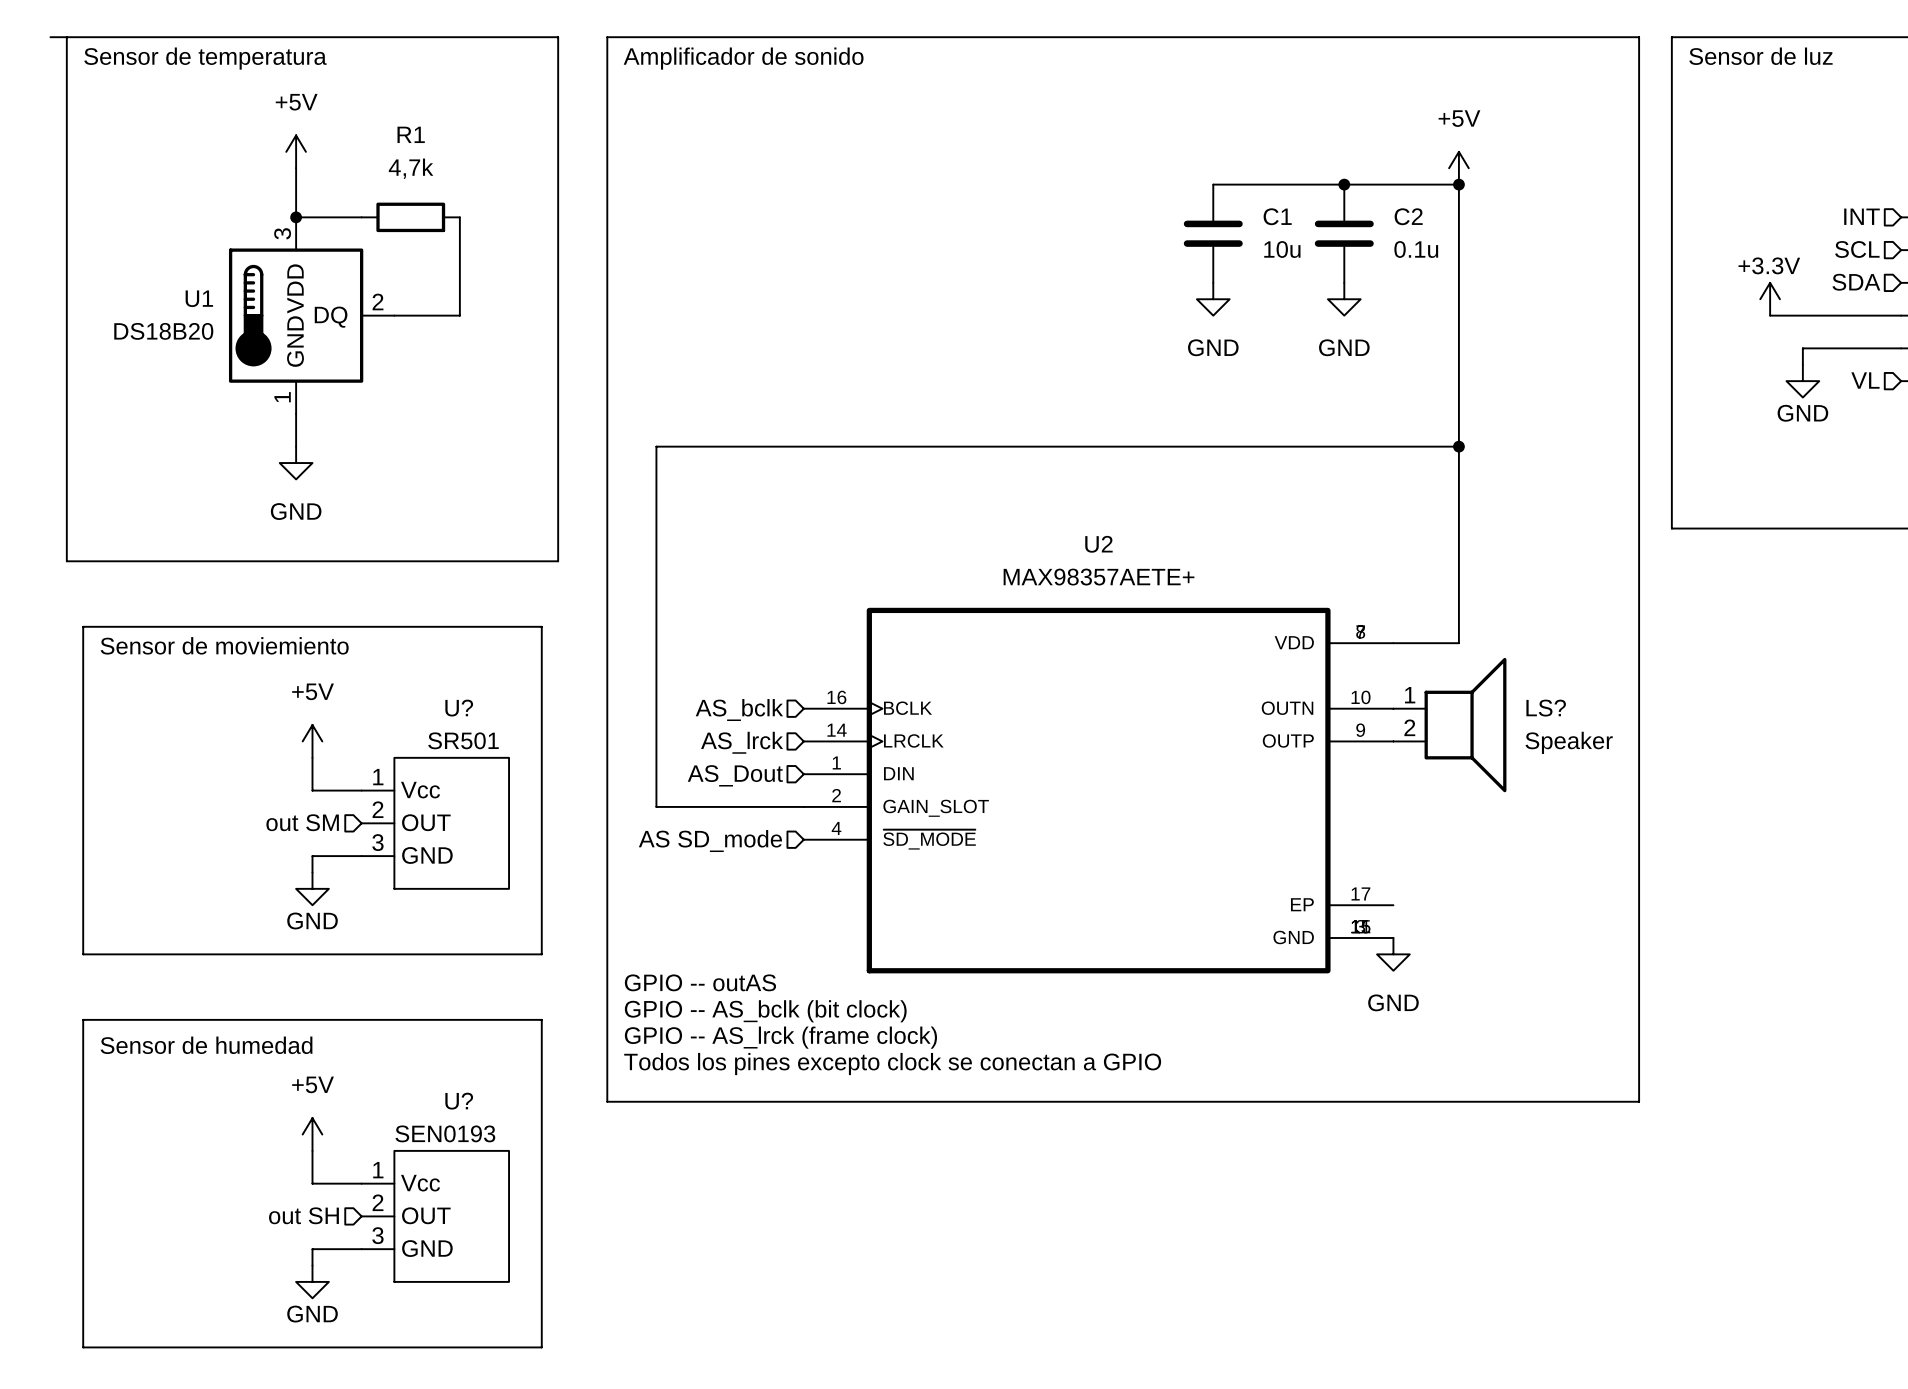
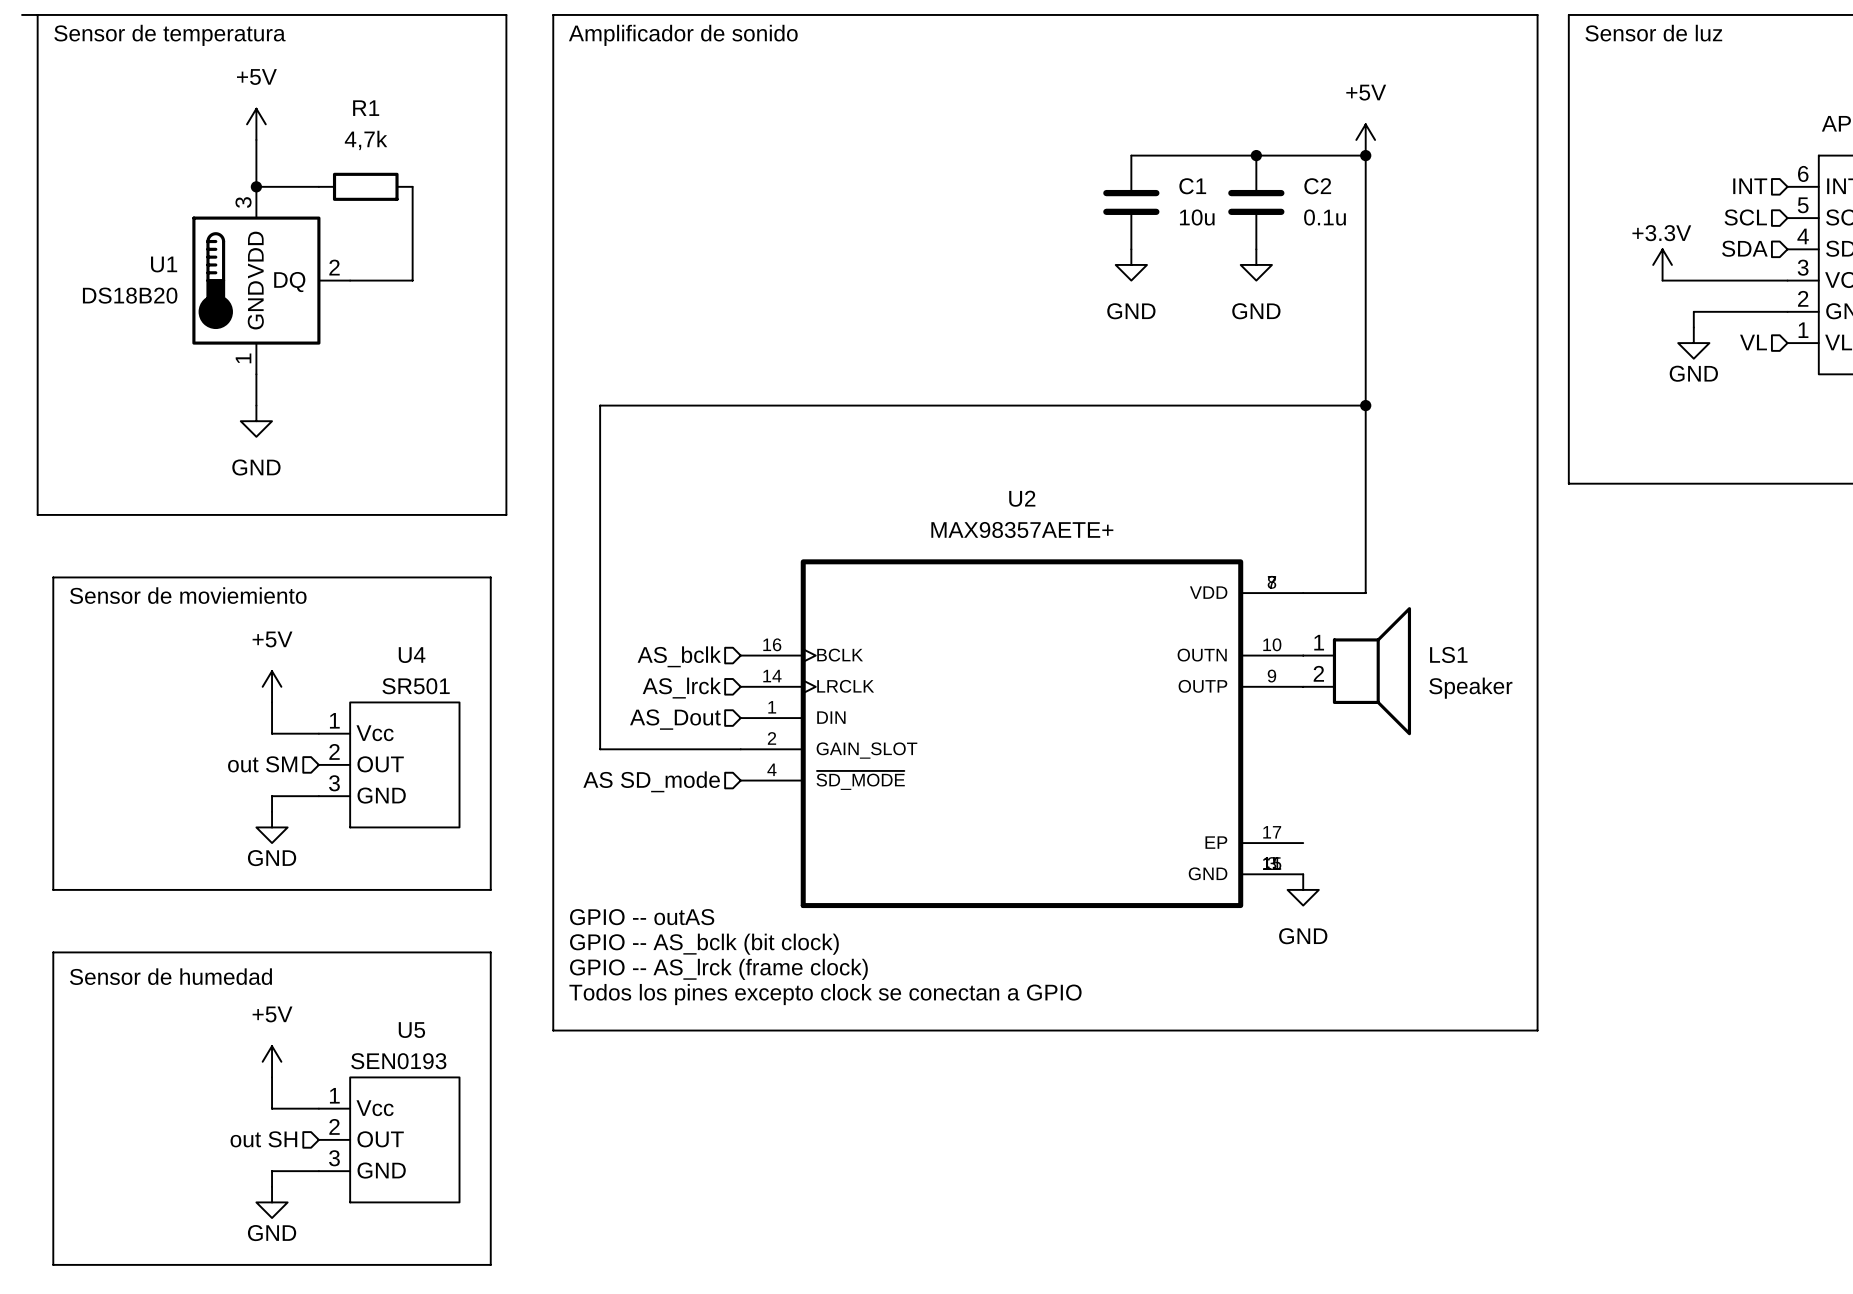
U? name: U? (459, 708) -> U4 (412, 655)
LS? name: LS? (1546, 708) -> LS1 (1448, 654)
U? name: U? (459, 1101) -> U5 (411, 1030)

